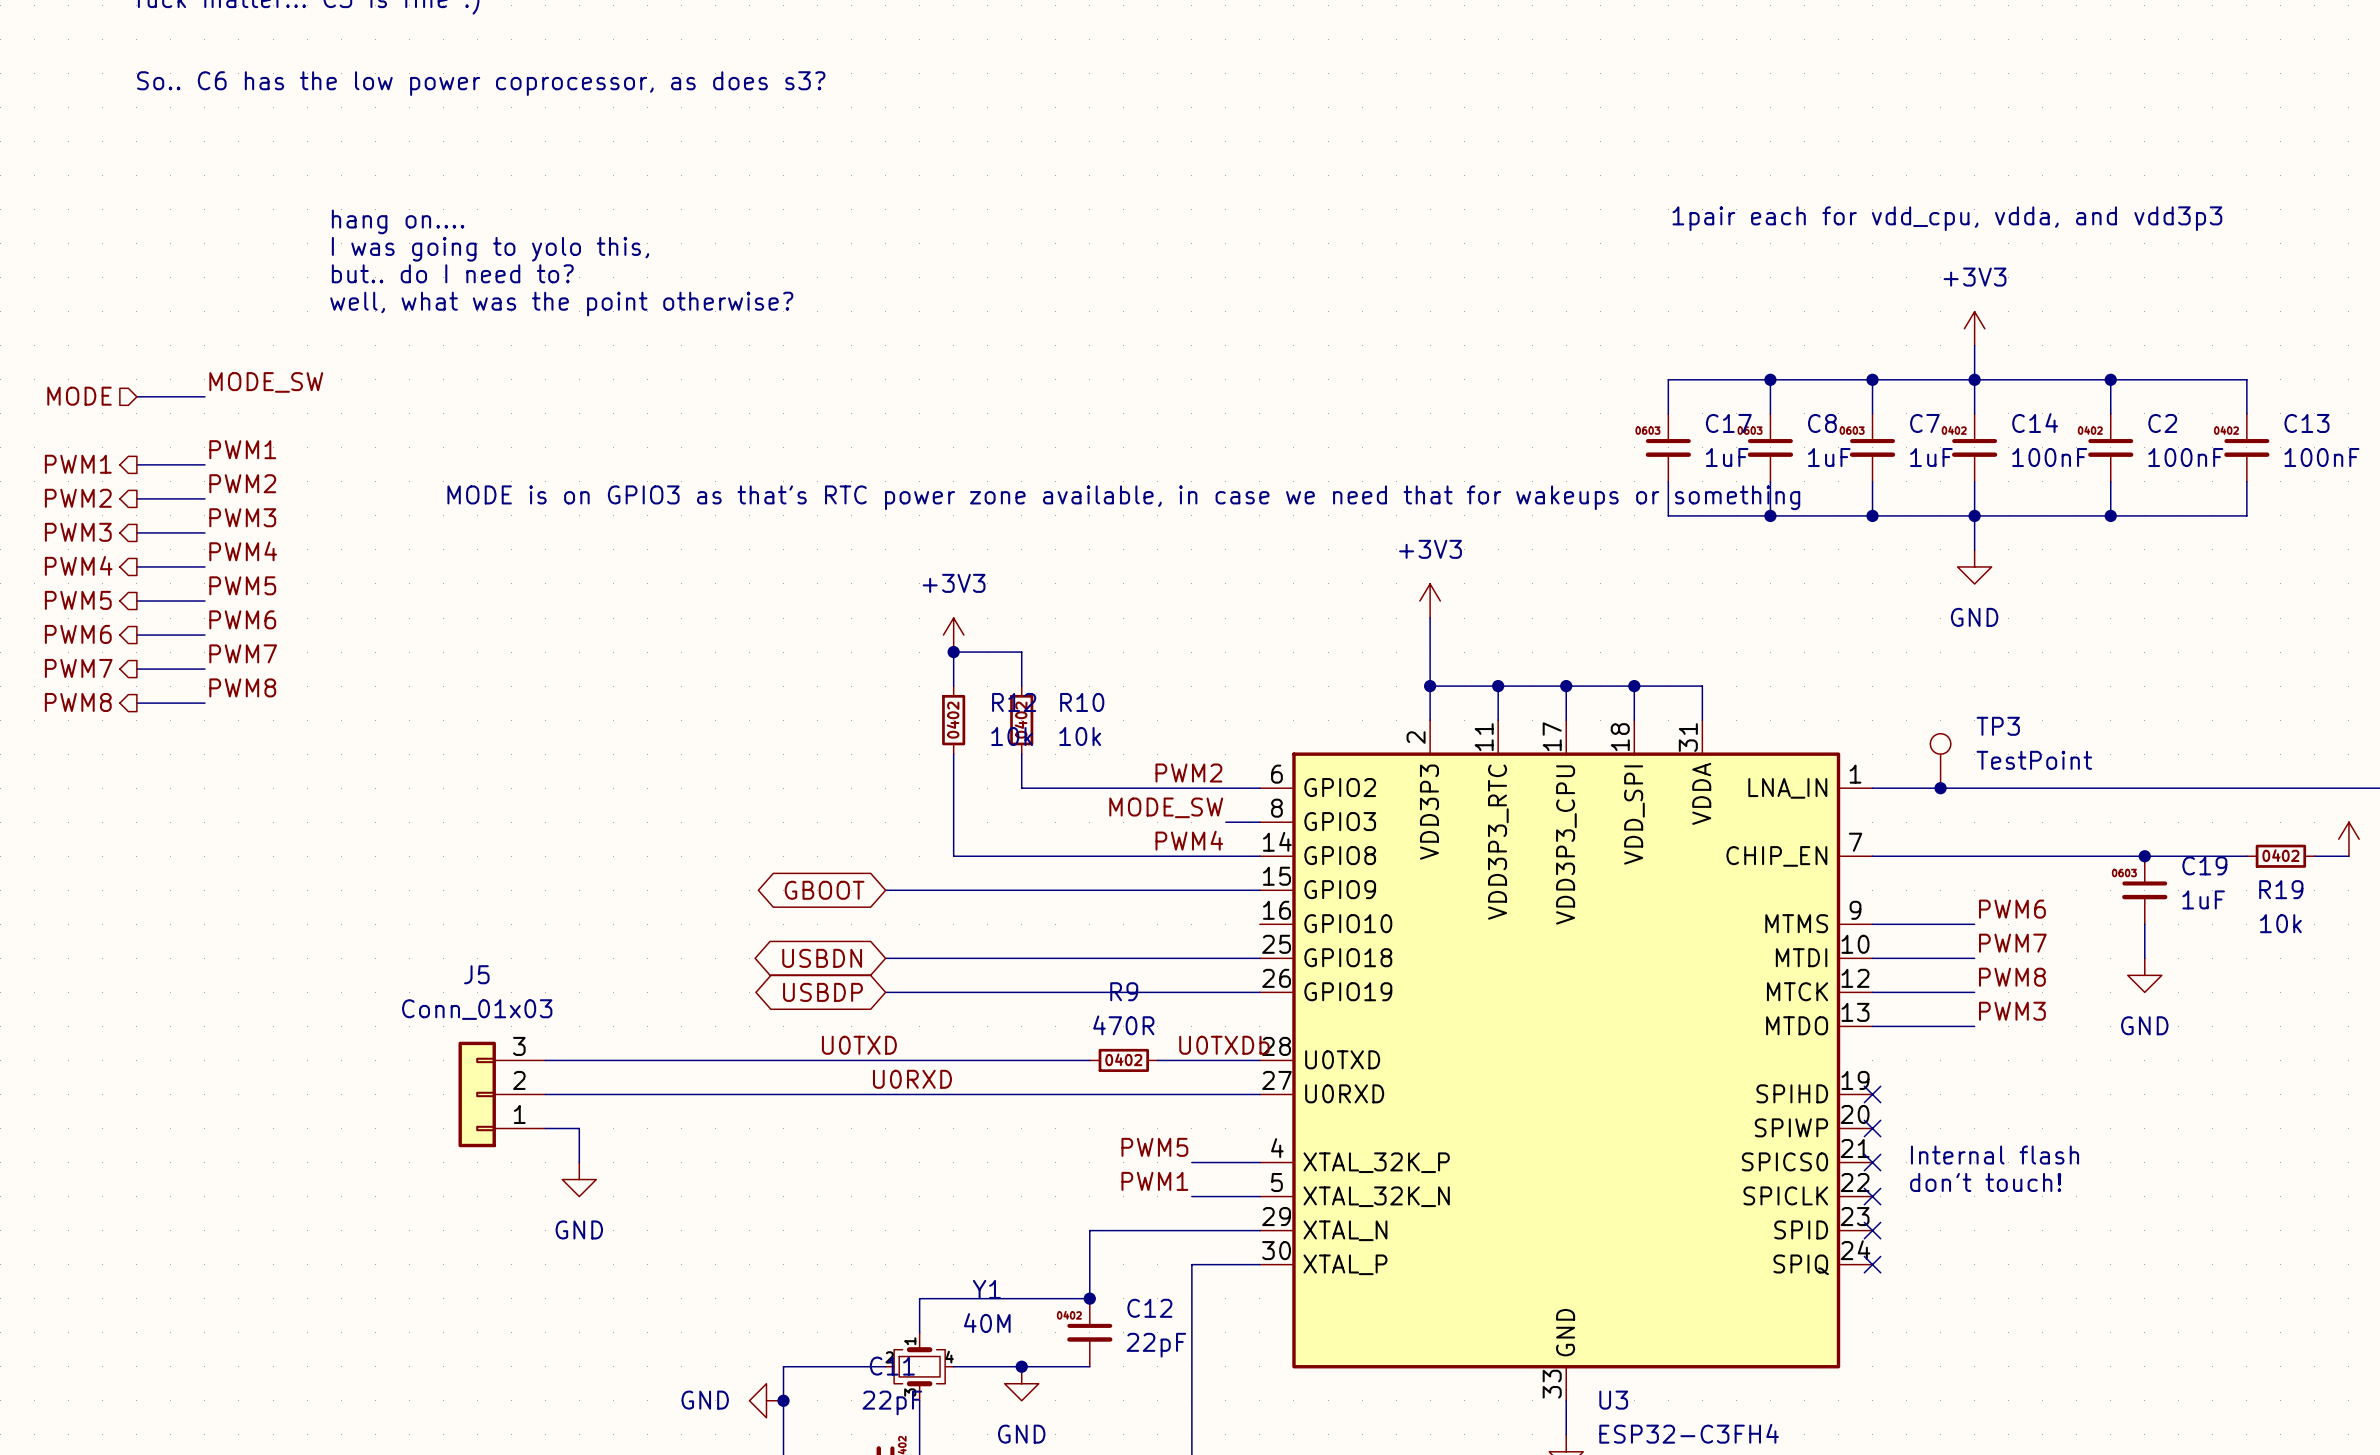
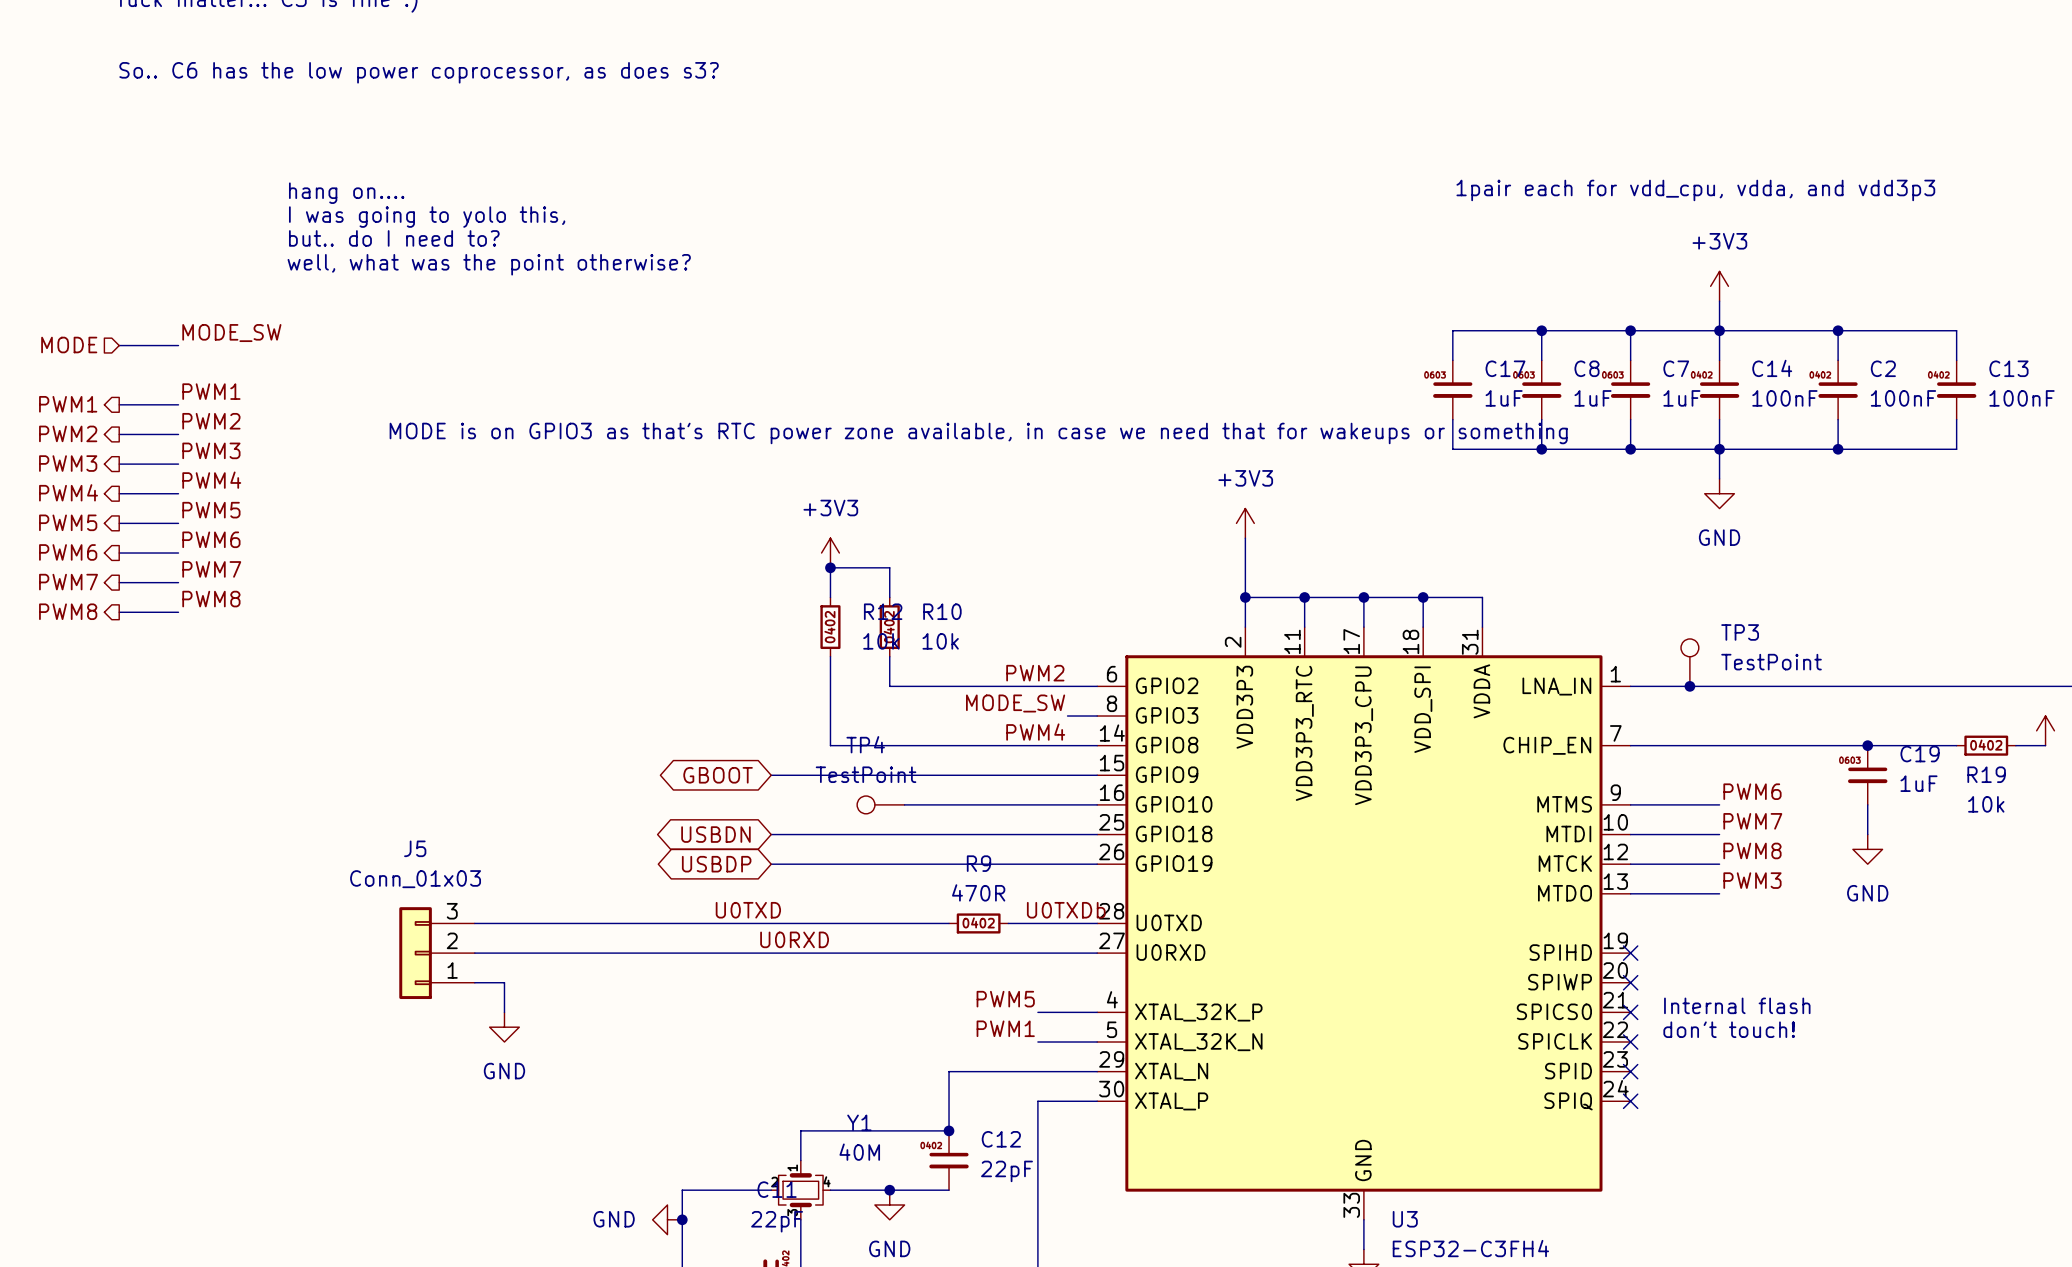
TP4: none -> TestPoint (880, 804)
wire: none -> (904, 804) (1097, 804)

